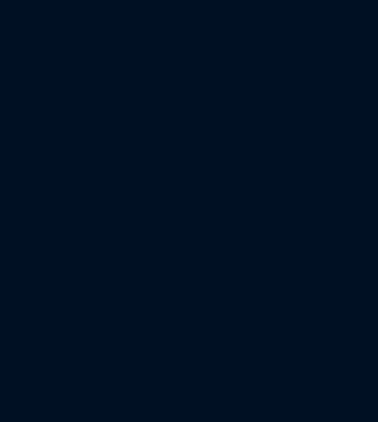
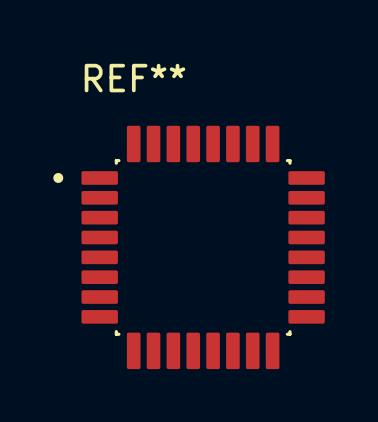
REF**: none -> (189, 247)

